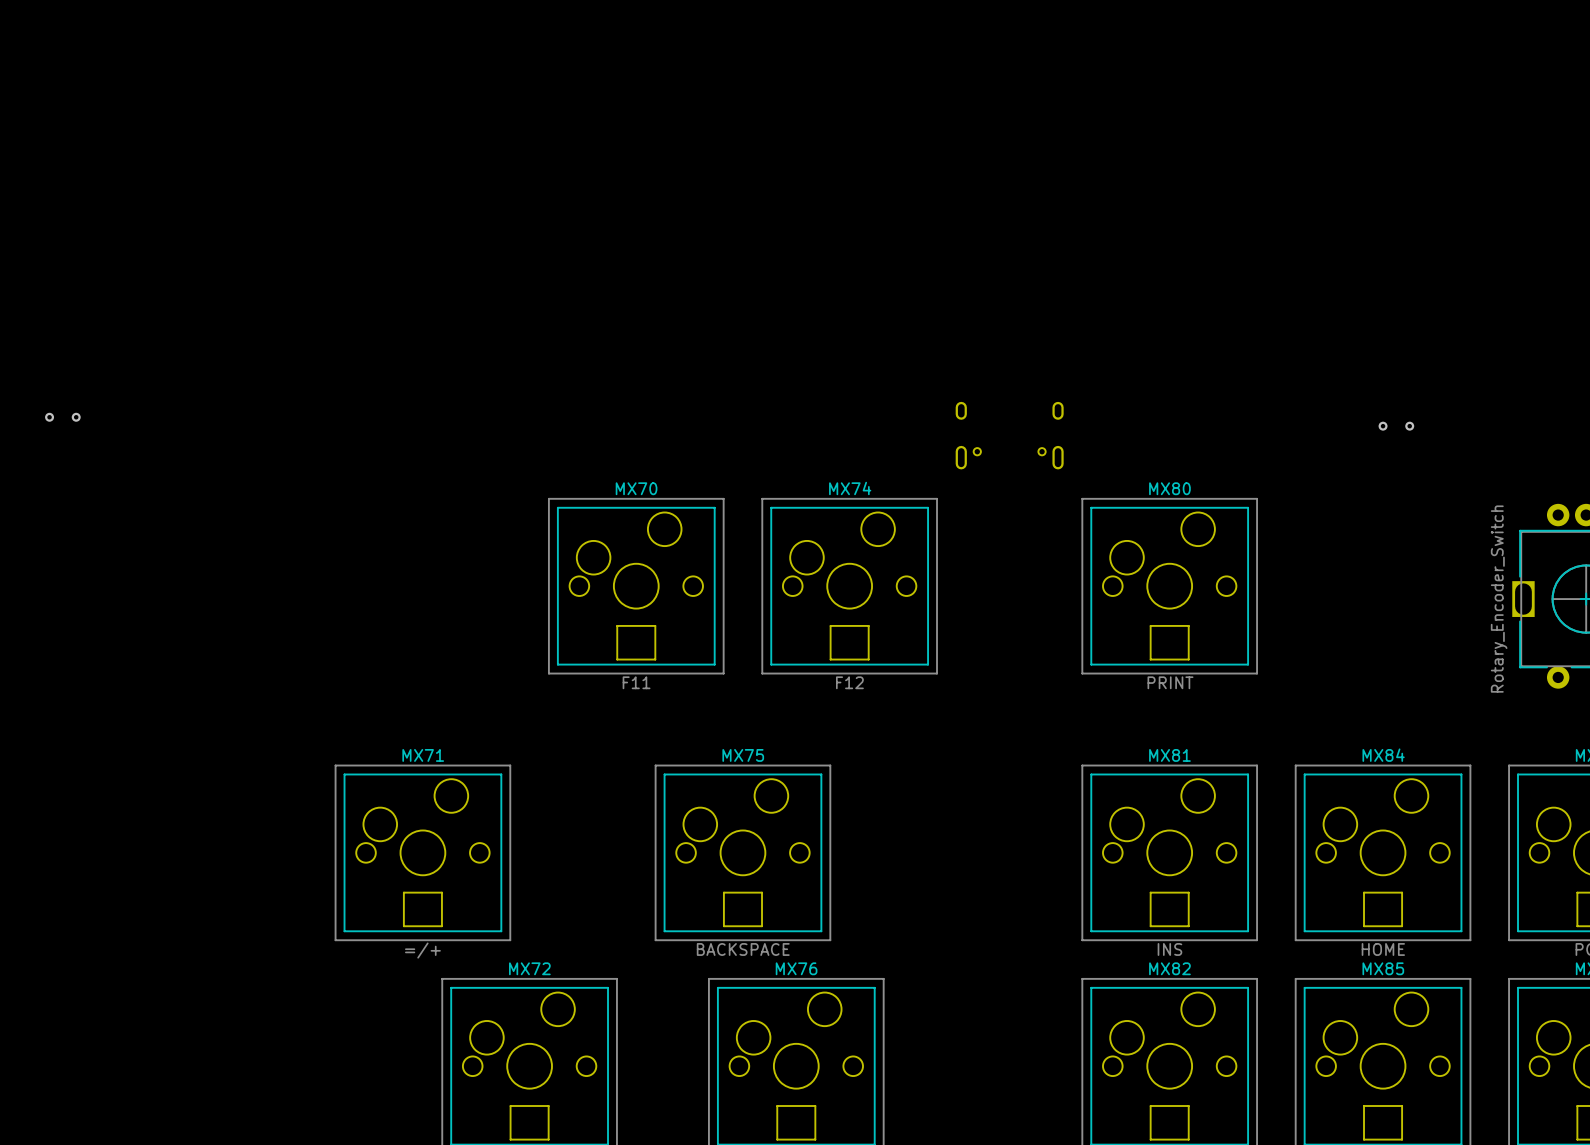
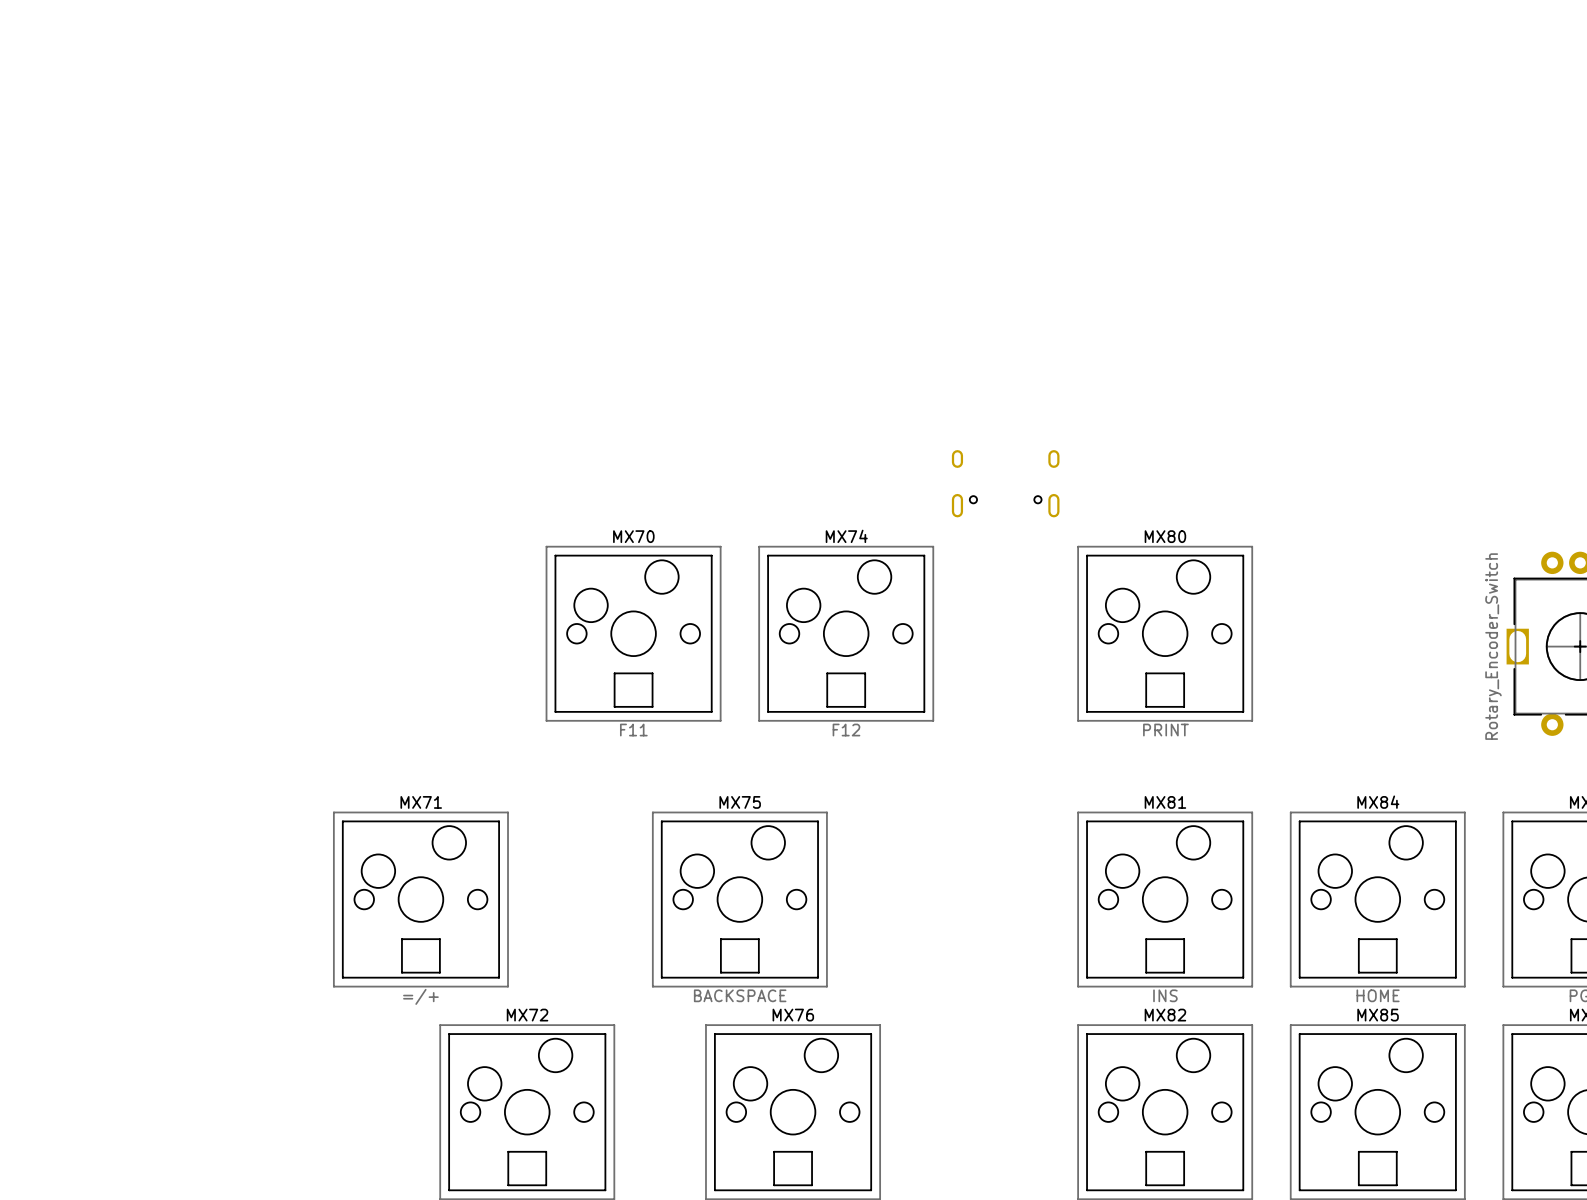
via: (49, 417) -> none
via: (76, 417) -> none
via: (1383, 426) -> none
via: (1409, 426) -> none

